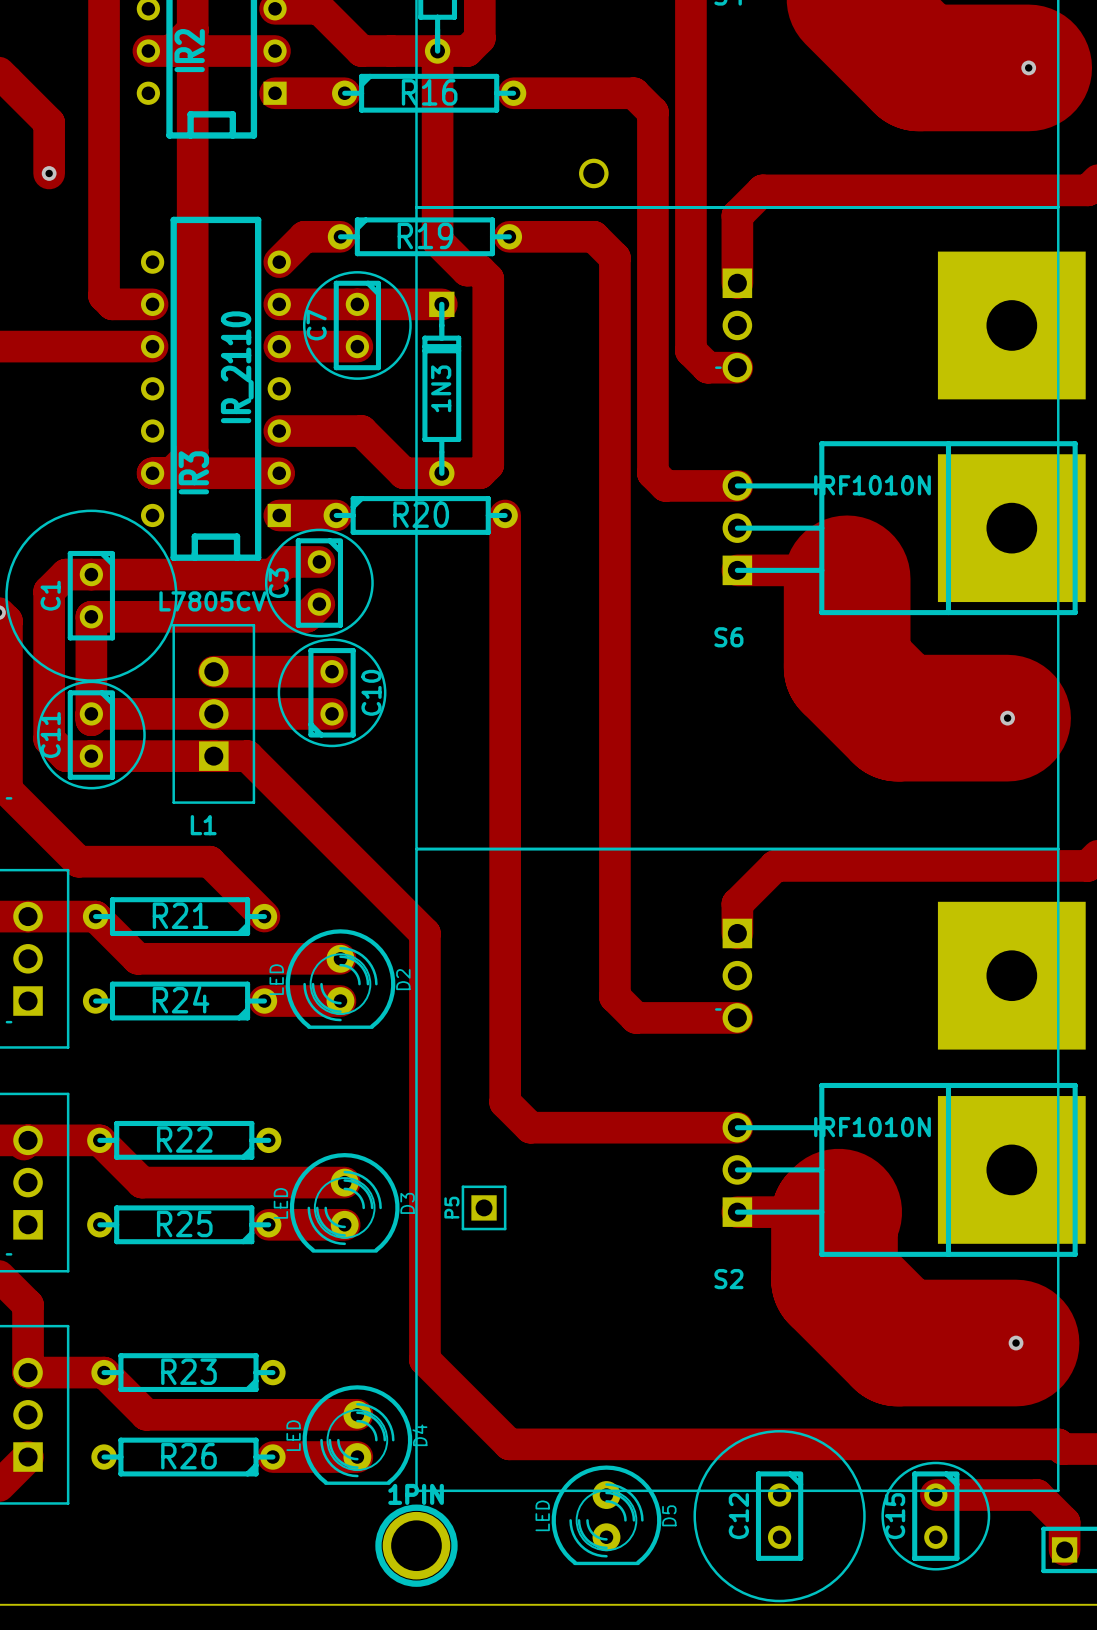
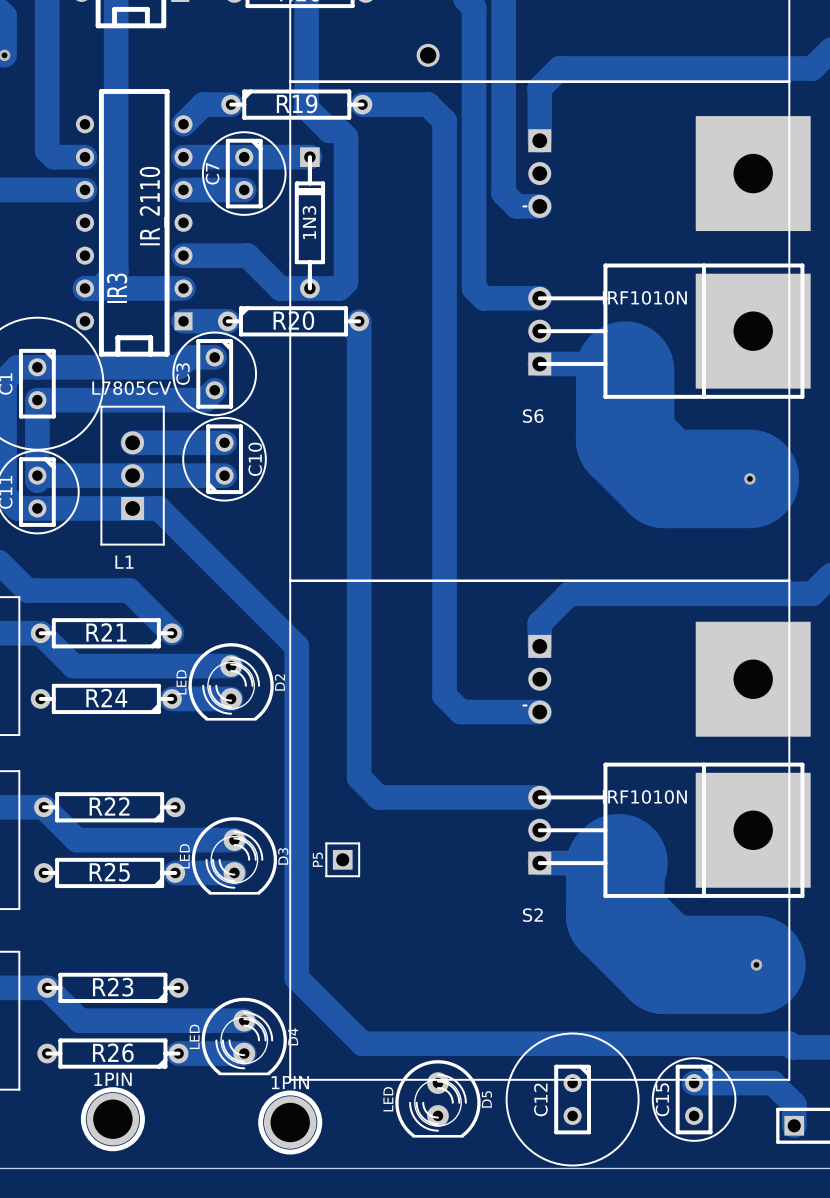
1PIN: none -> (112, 1119)

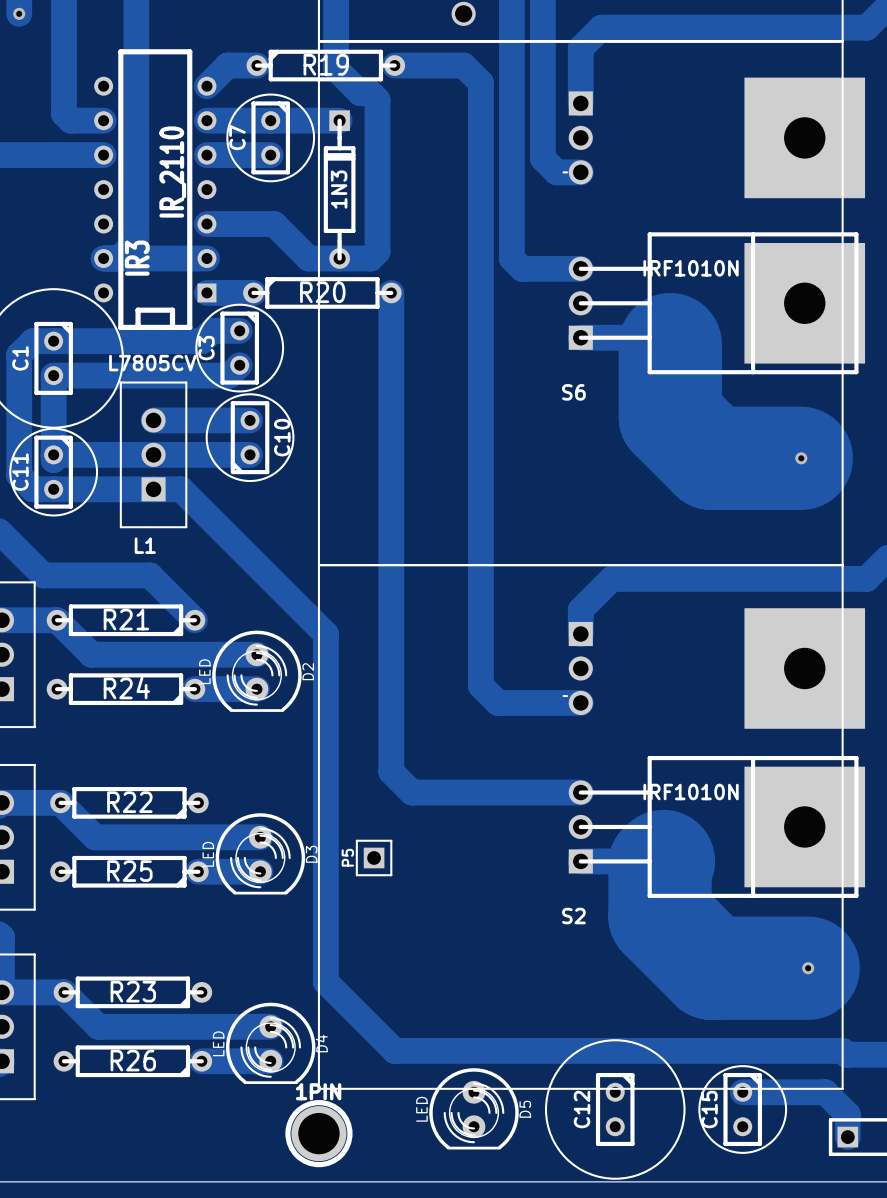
1PIN: (112, 1119) -> none

